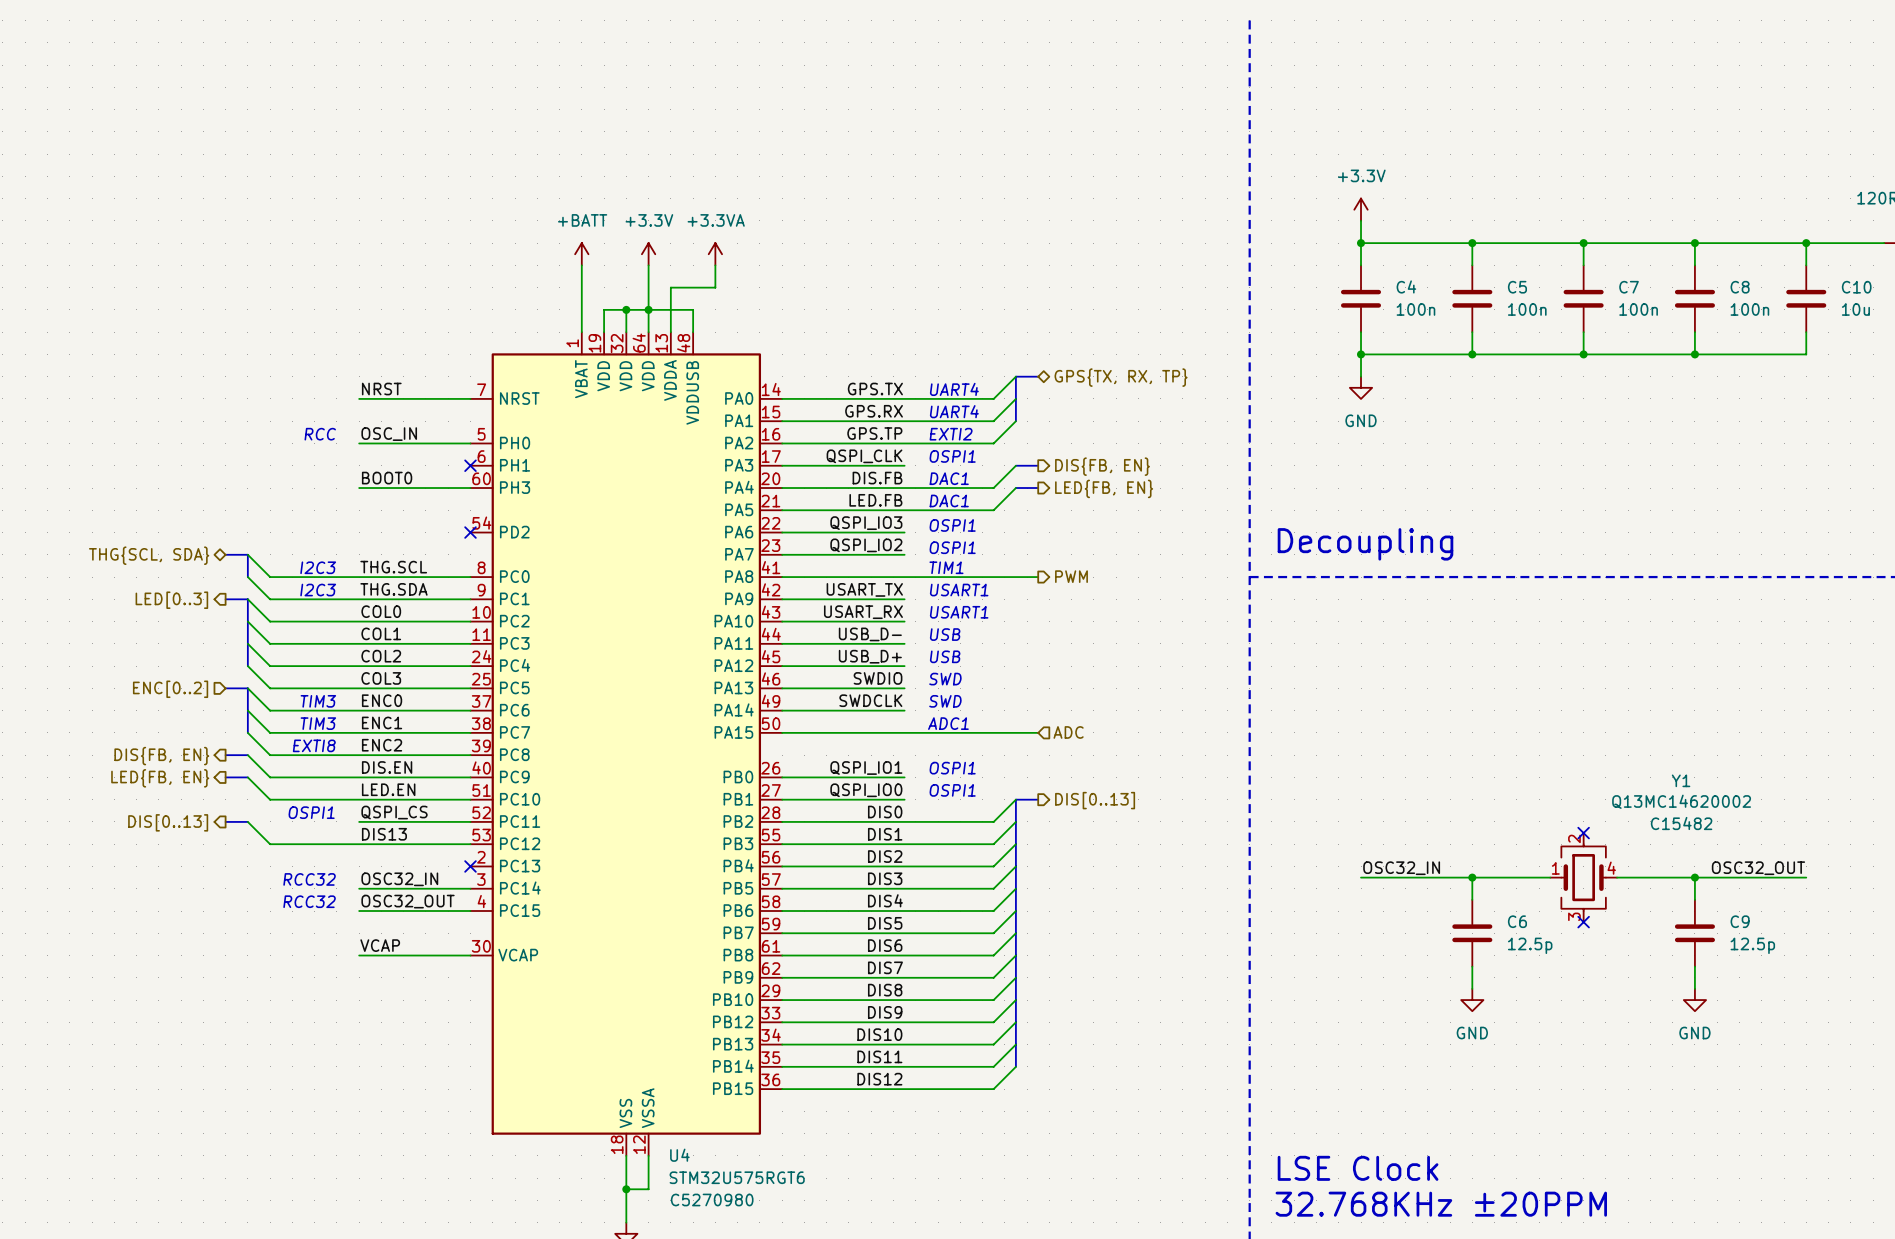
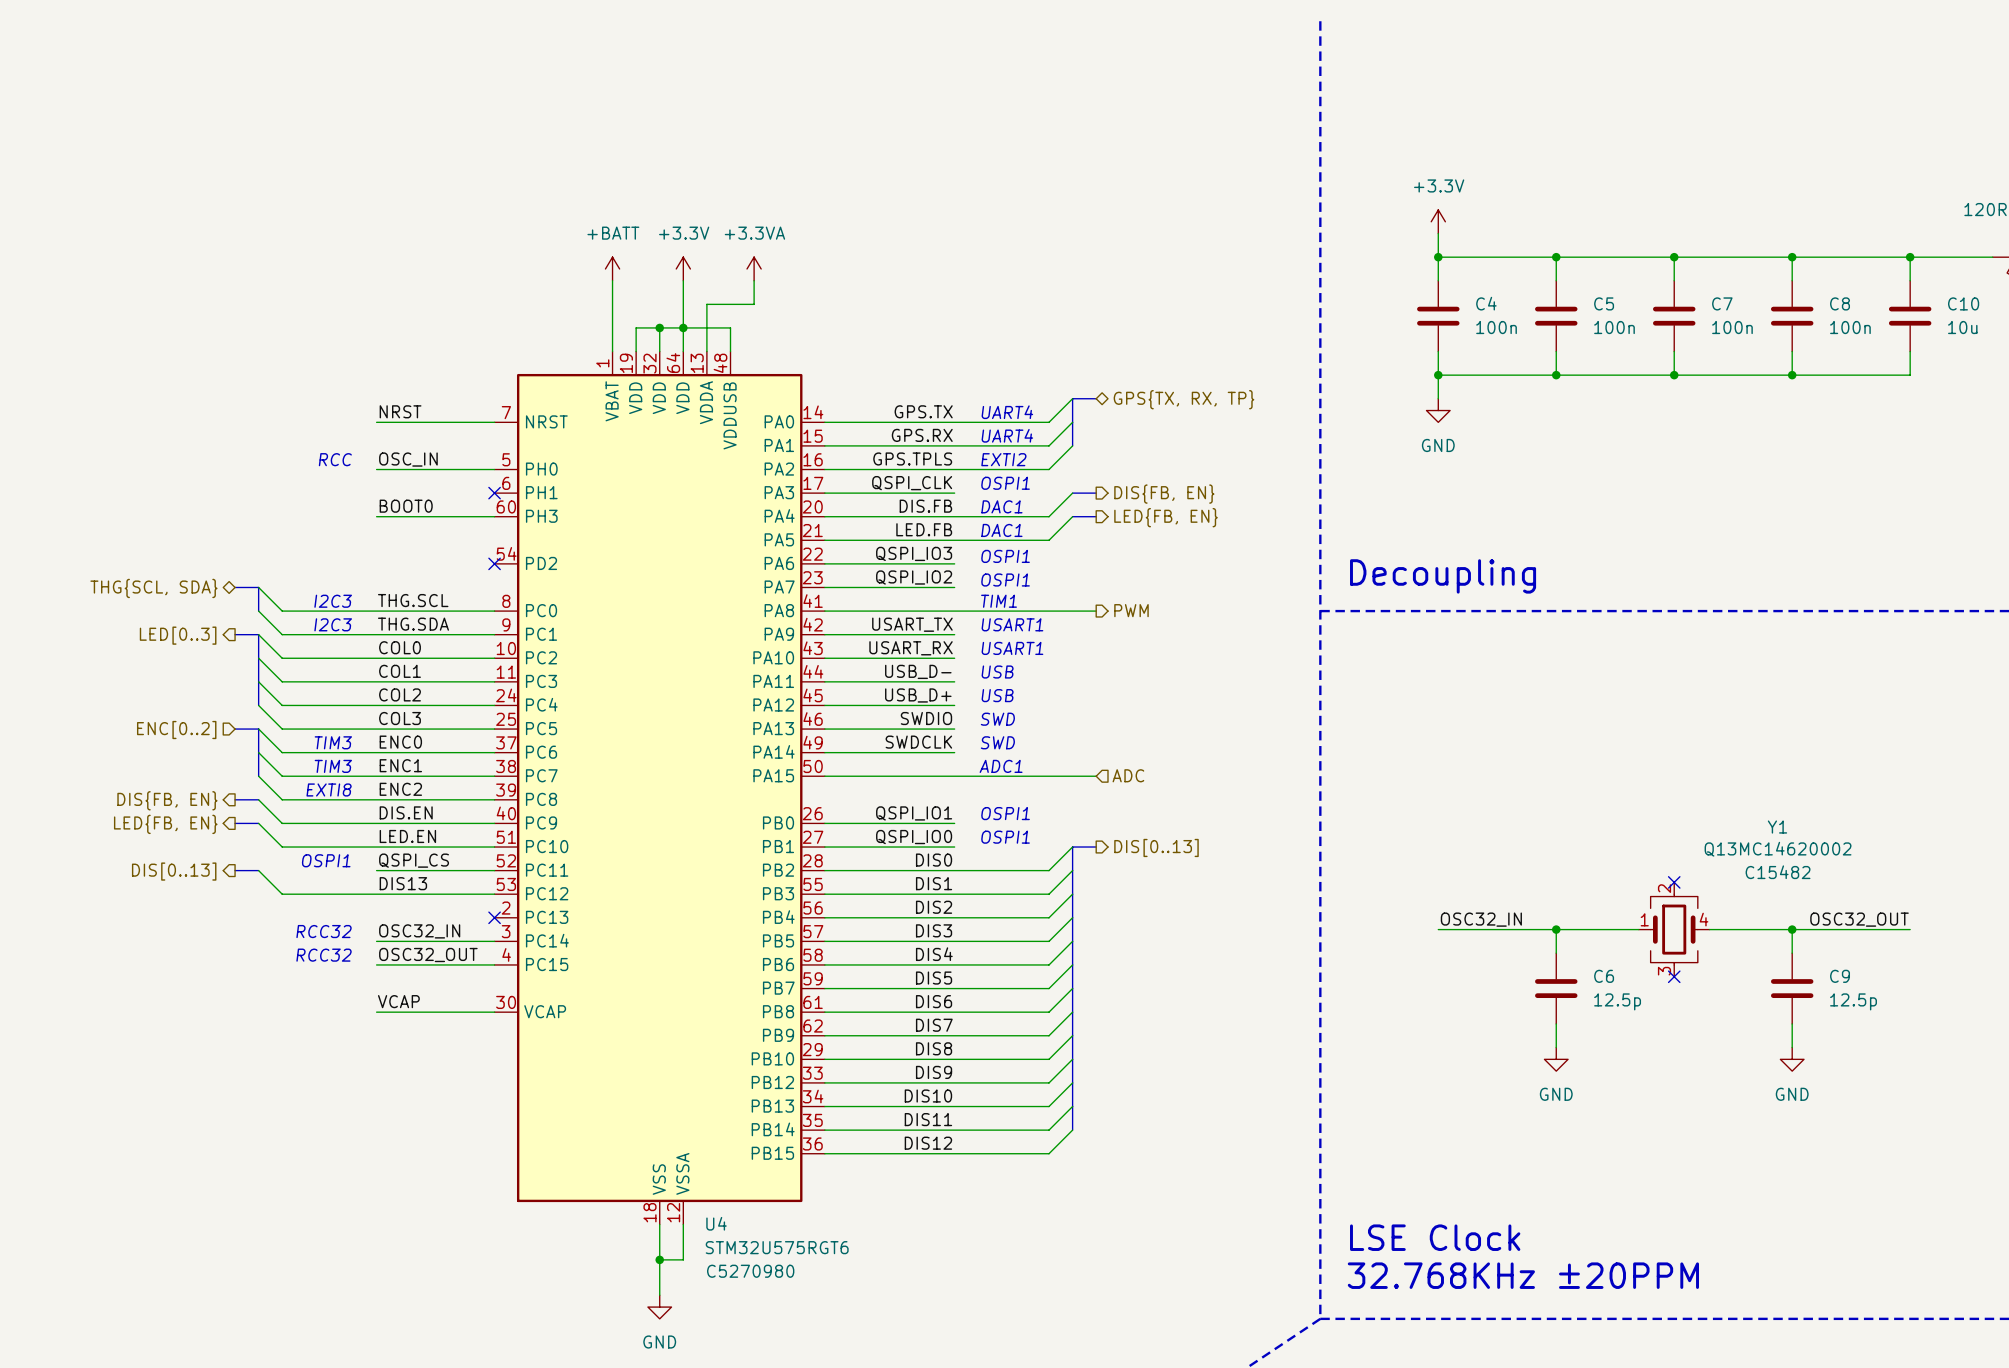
label: GPS.TP (874, 433) -> GPS.TPLS (912, 458)

